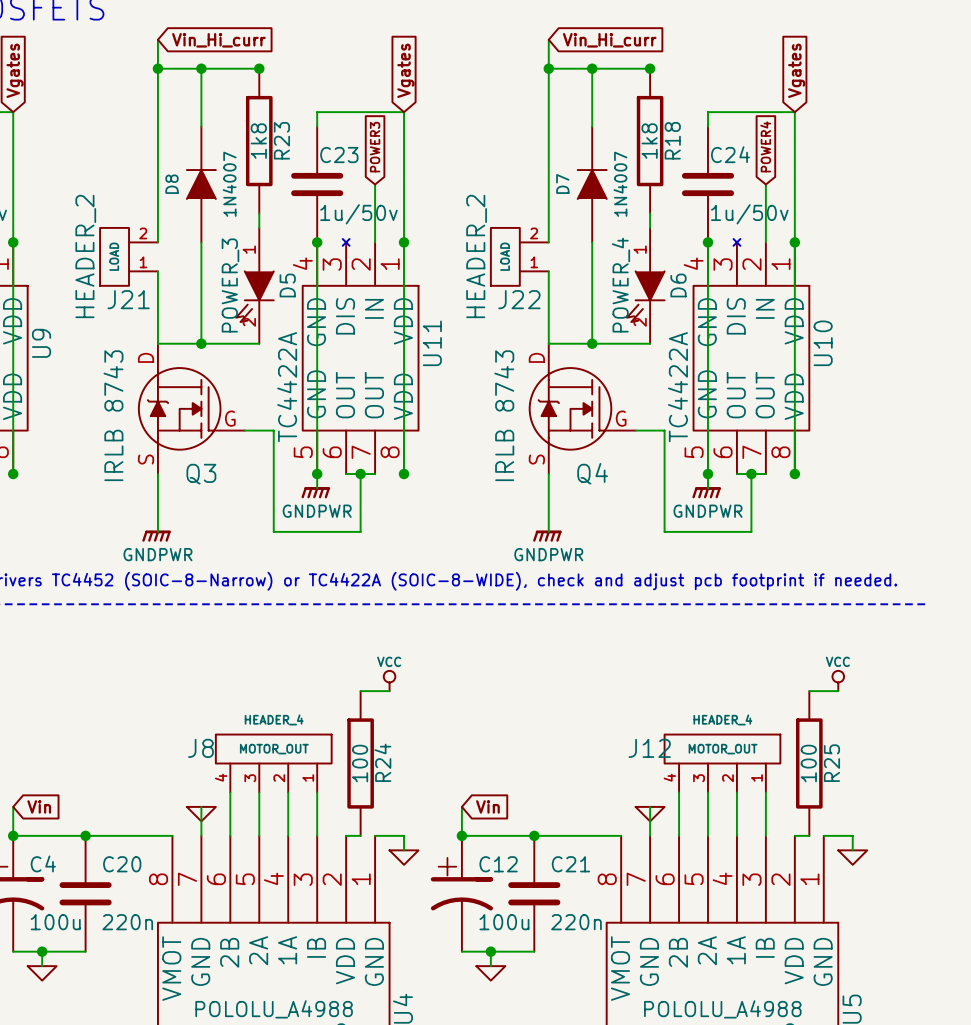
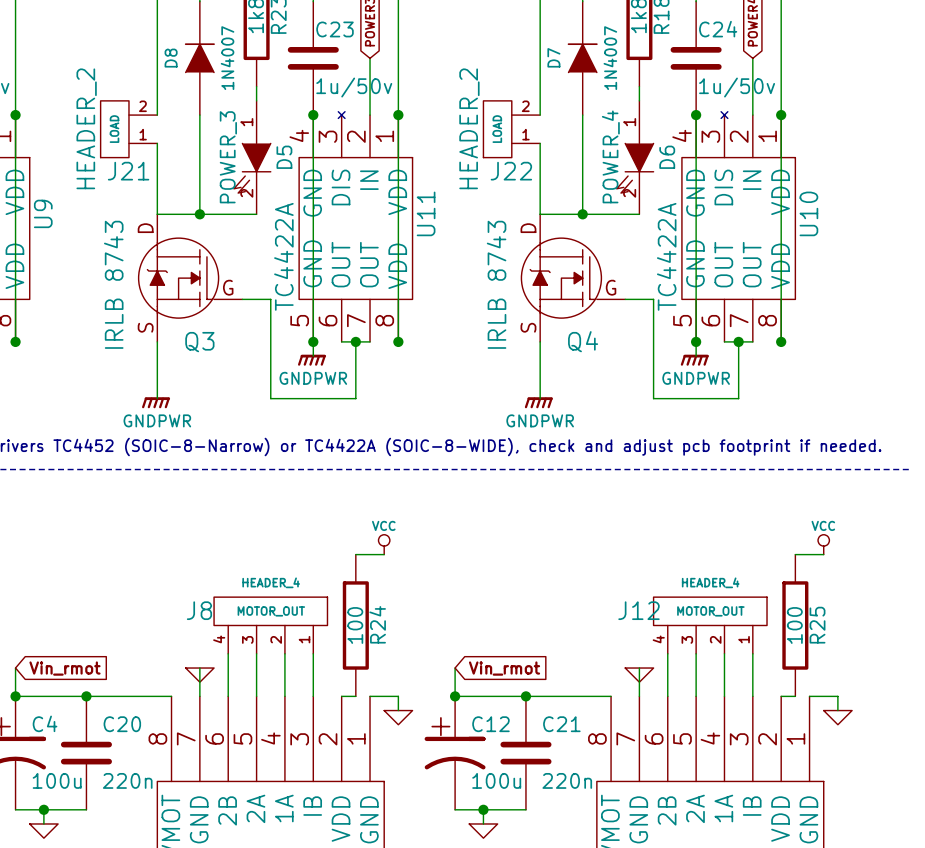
global label: Vin (39, 806) -> Vin_rmot (64, 668)
global label: Vin (487, 806) -> Vin_rmot (504, 668)

